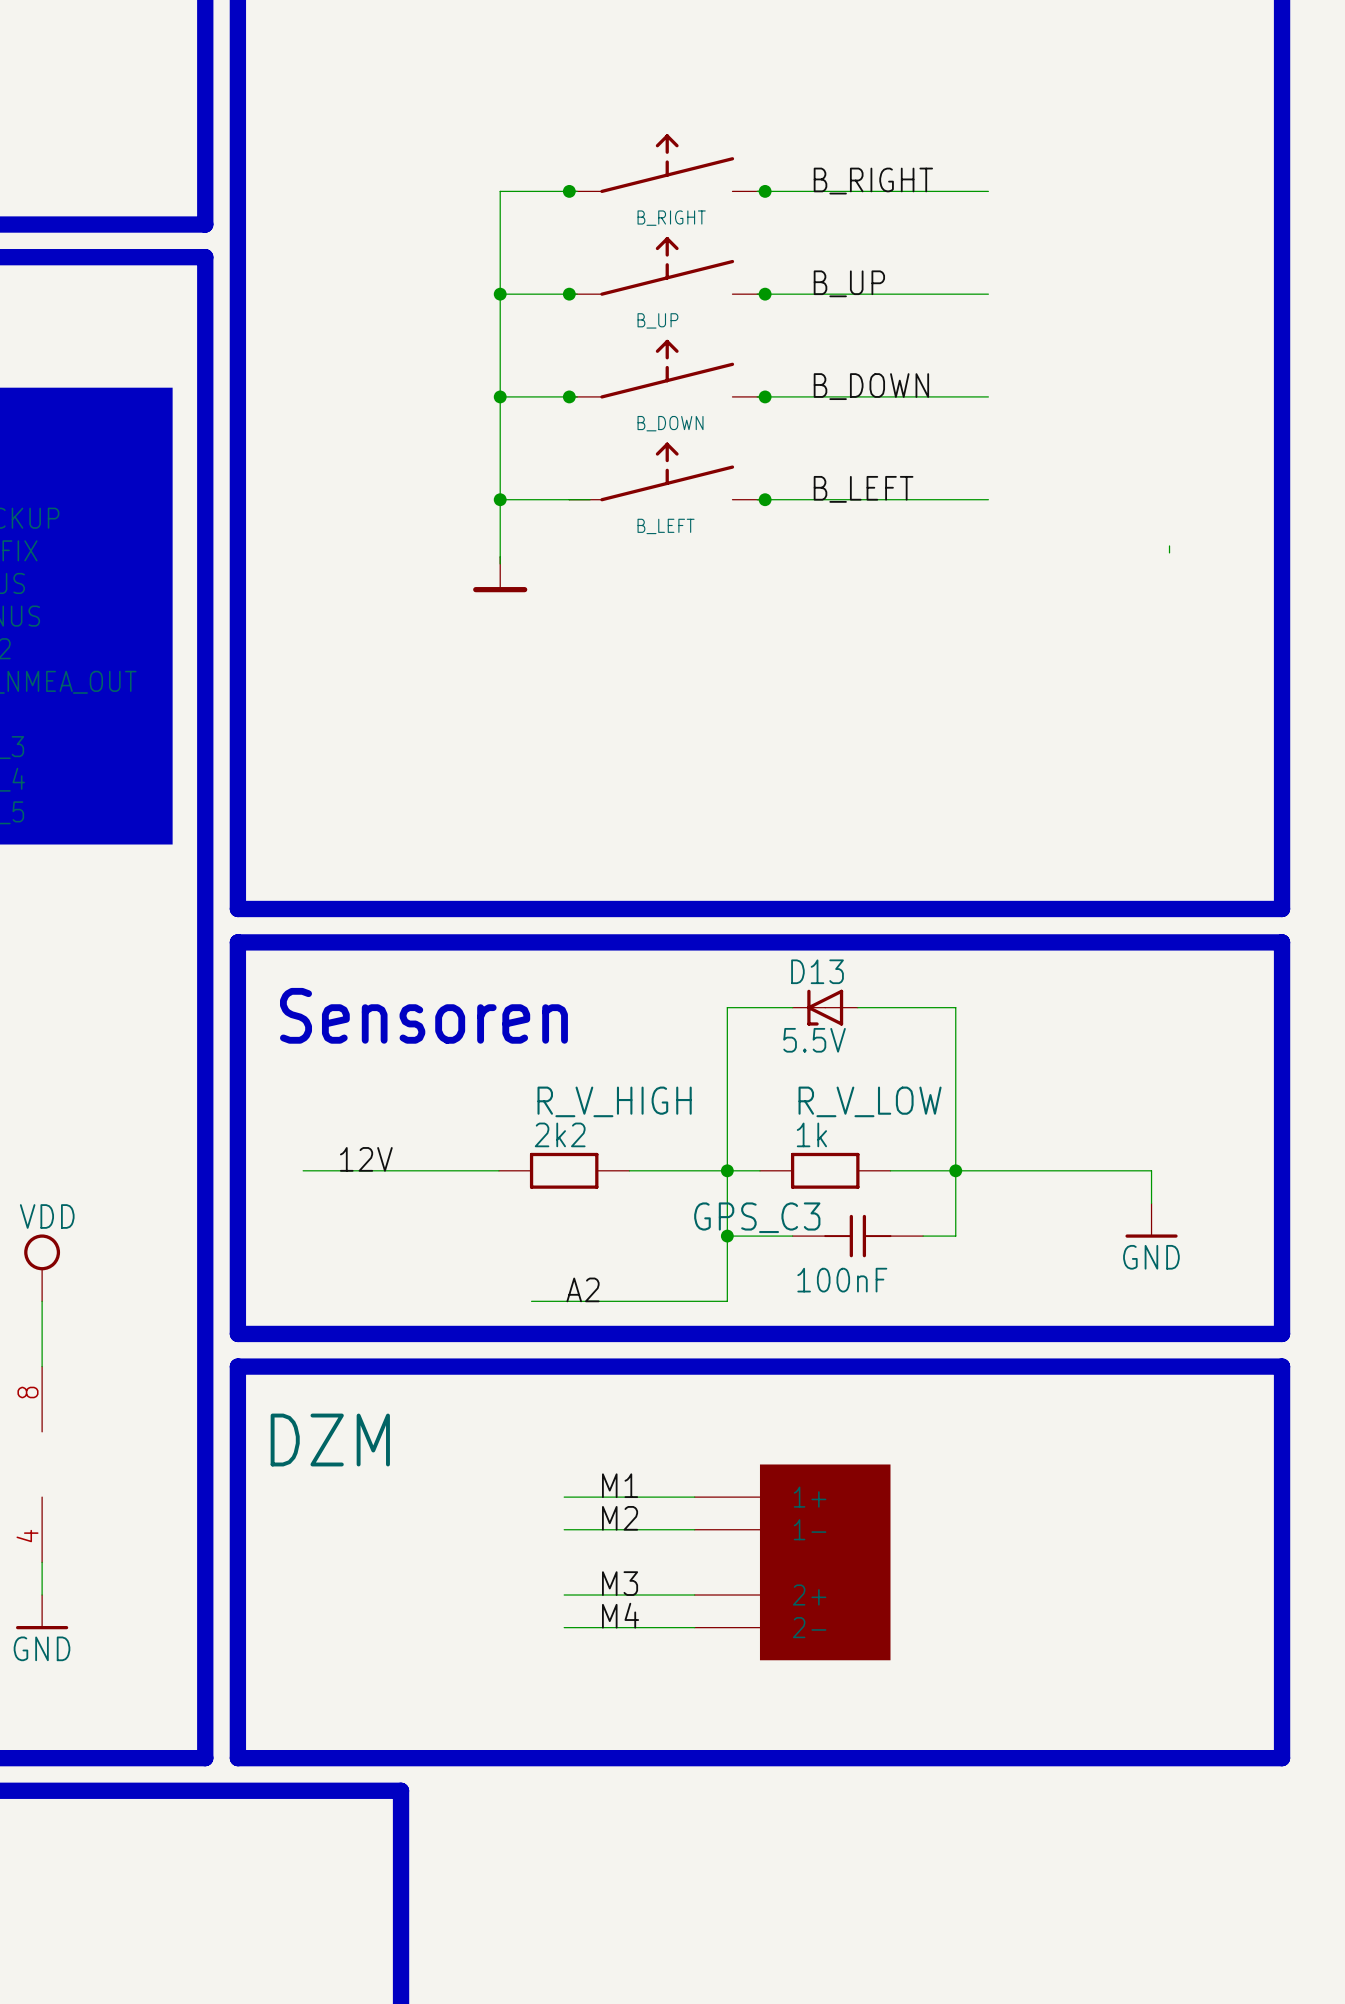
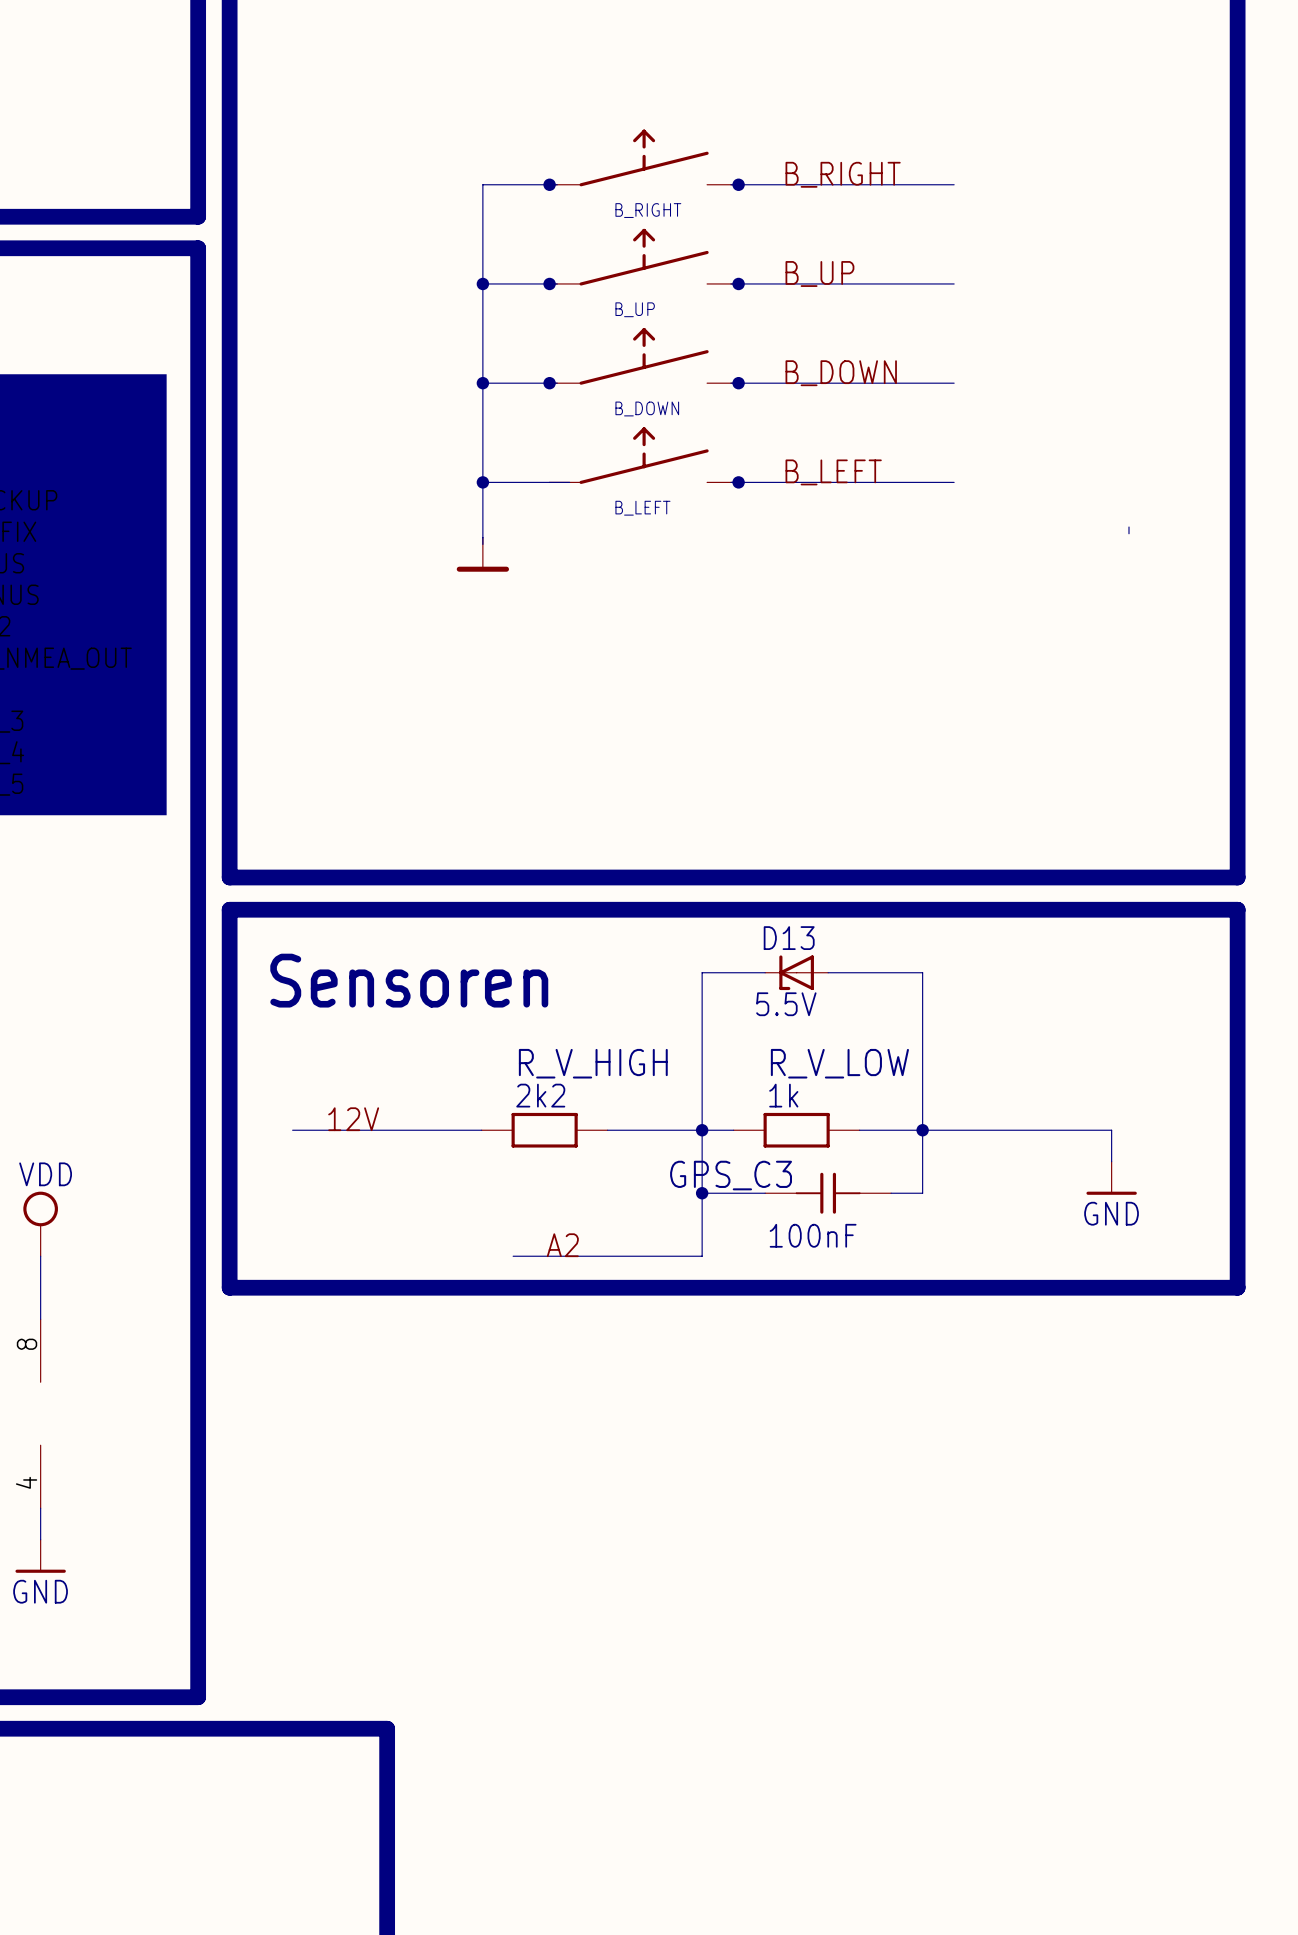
line: (237, 1366) (1282, 1366) (1282, 1758) (237, 1758) (237, 1366) -> none
text: DZM (330, 1440) -> none
label: M1 (620, 1485) -> none
wire: (564, 1497) (694, 1497) -> none
label: M2 (620, 1518) -> none
wire: (564, 1529) (694, 1529) -> none
part: (792, 1562) -> none
label: M3 (620, 1583) -> none
wire: (564, 1595) (694, 1595) -> none
label: M4 (620, 1615) -> none
wire: (564, 1627) (694, 1627) -> none

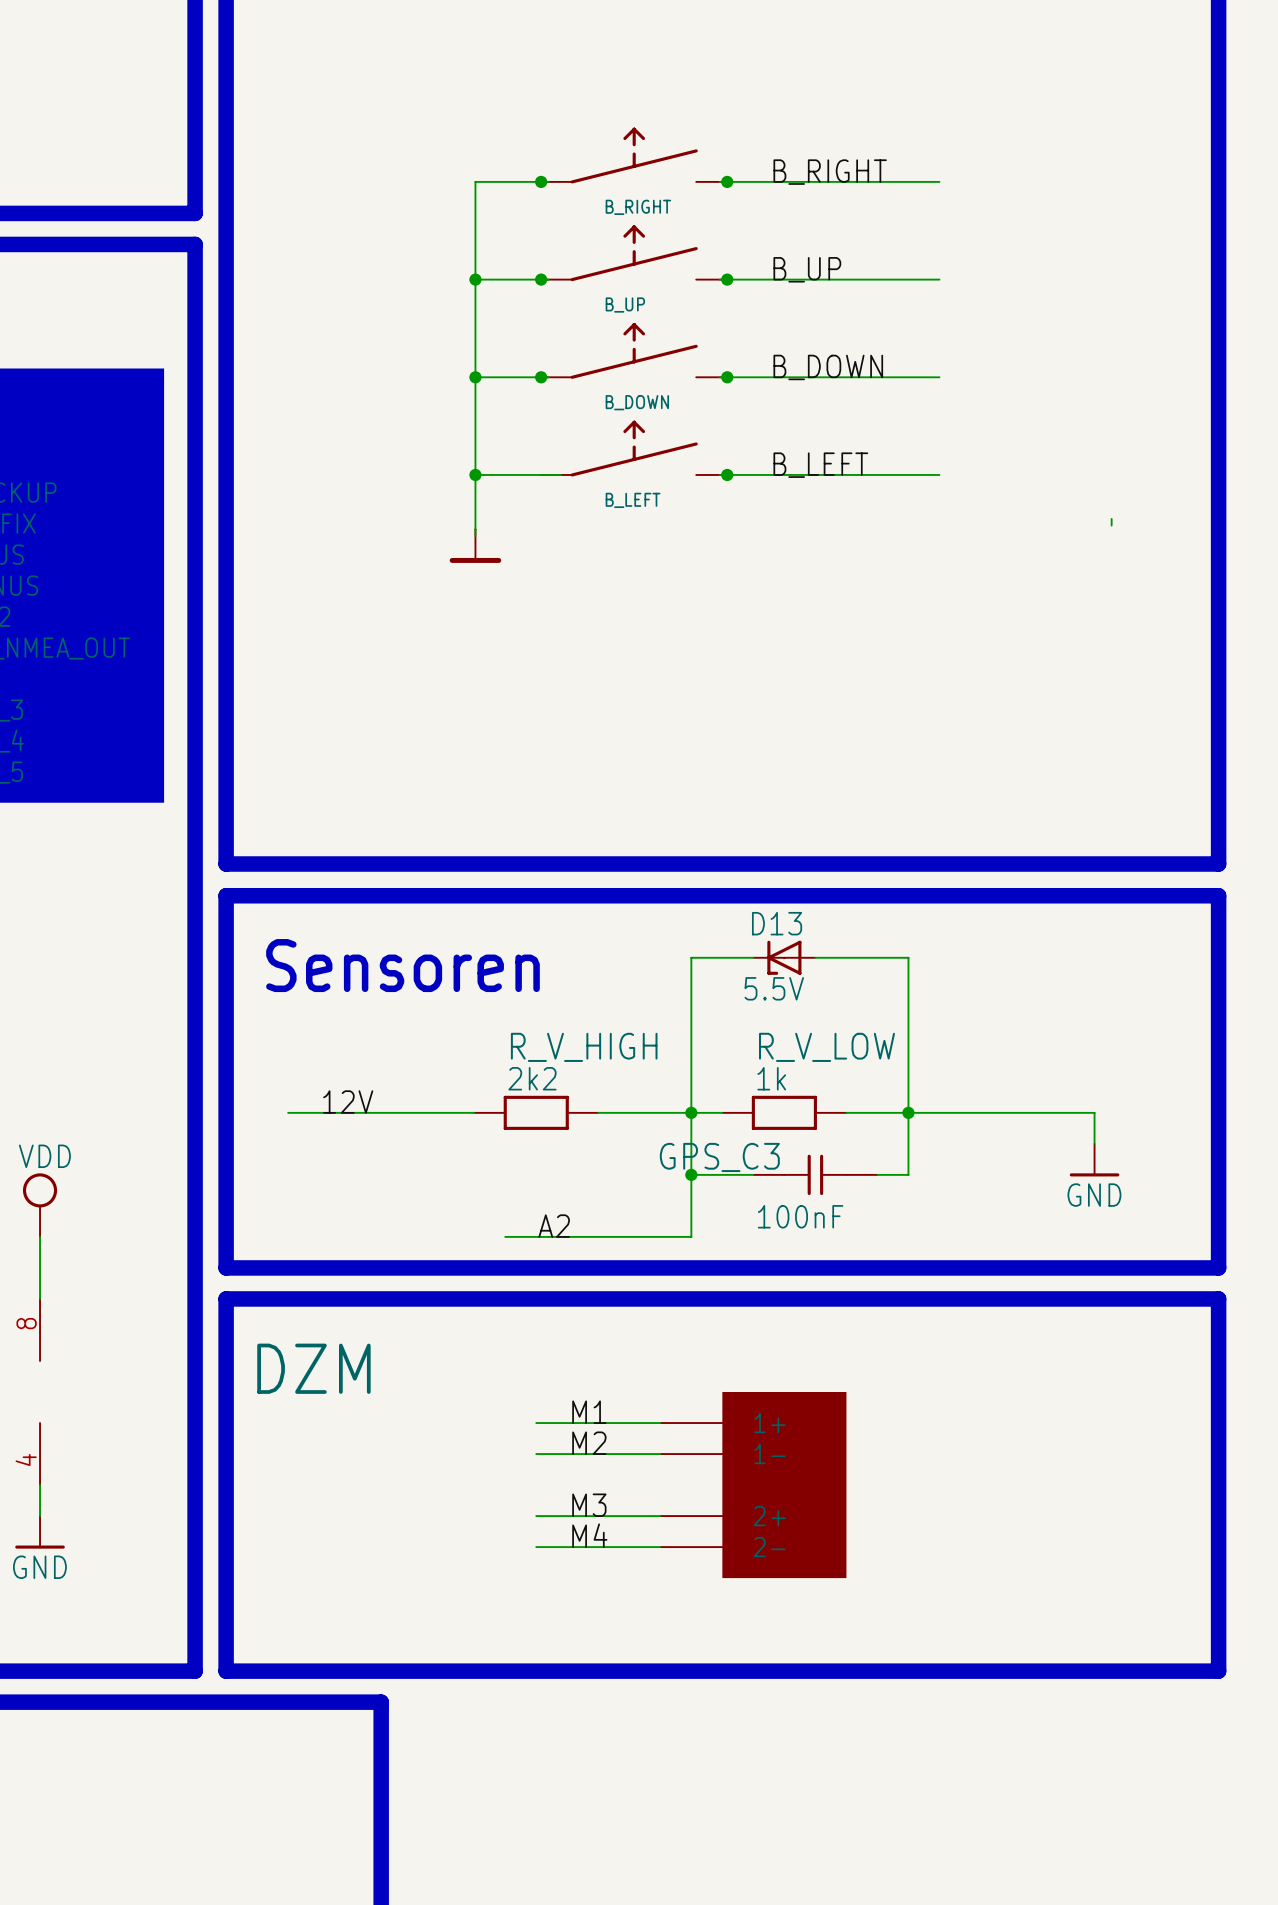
line: none -> (226, 1298) (1218, 1298) (1218, 1671) (226, 1671) (226, 1298)
text: none -> DZM (313, 1368)
label: none -> M1 (589, 1412)
wire: none -> (536, 1423) (660, 1423)
label: none -> M2 (589, 1443)
wire: none -> (536, 1454) (660, 1454)
part: none -> (753, 1485)
label: none -> M3 (589, 1505)
wire: none -> (536, 1516) (660, 1516)
label: none -> M4 (589, 1535)
wire: none -> (536, 1547) (660, 1547)

